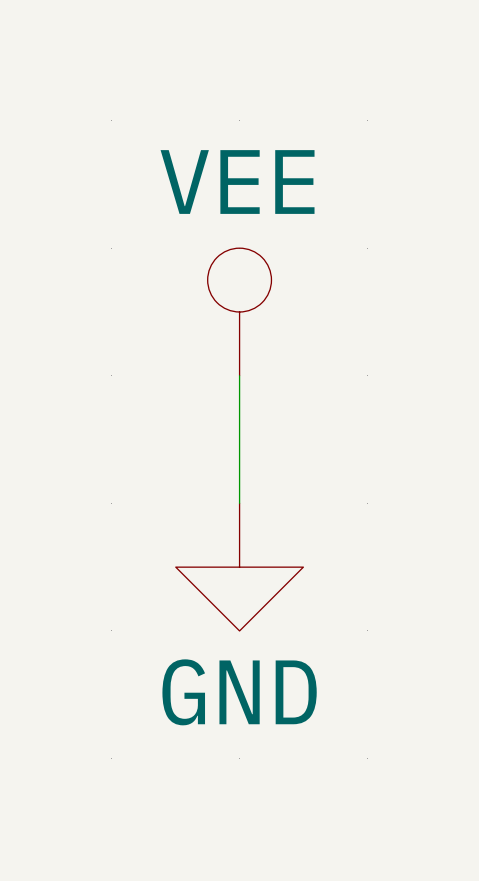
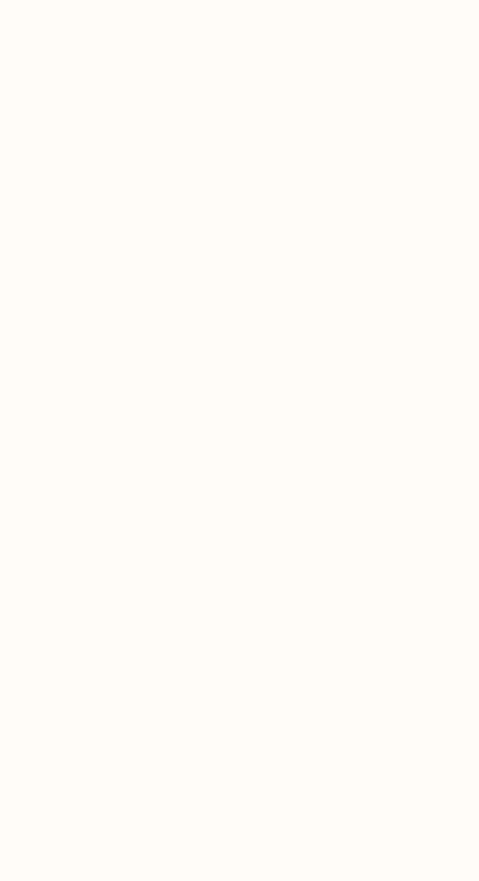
power symbol: VEE (239, 311) -> none
wire: (239, 375) (239, 503) -> none
power symbol: GND (239, 567) -> none

